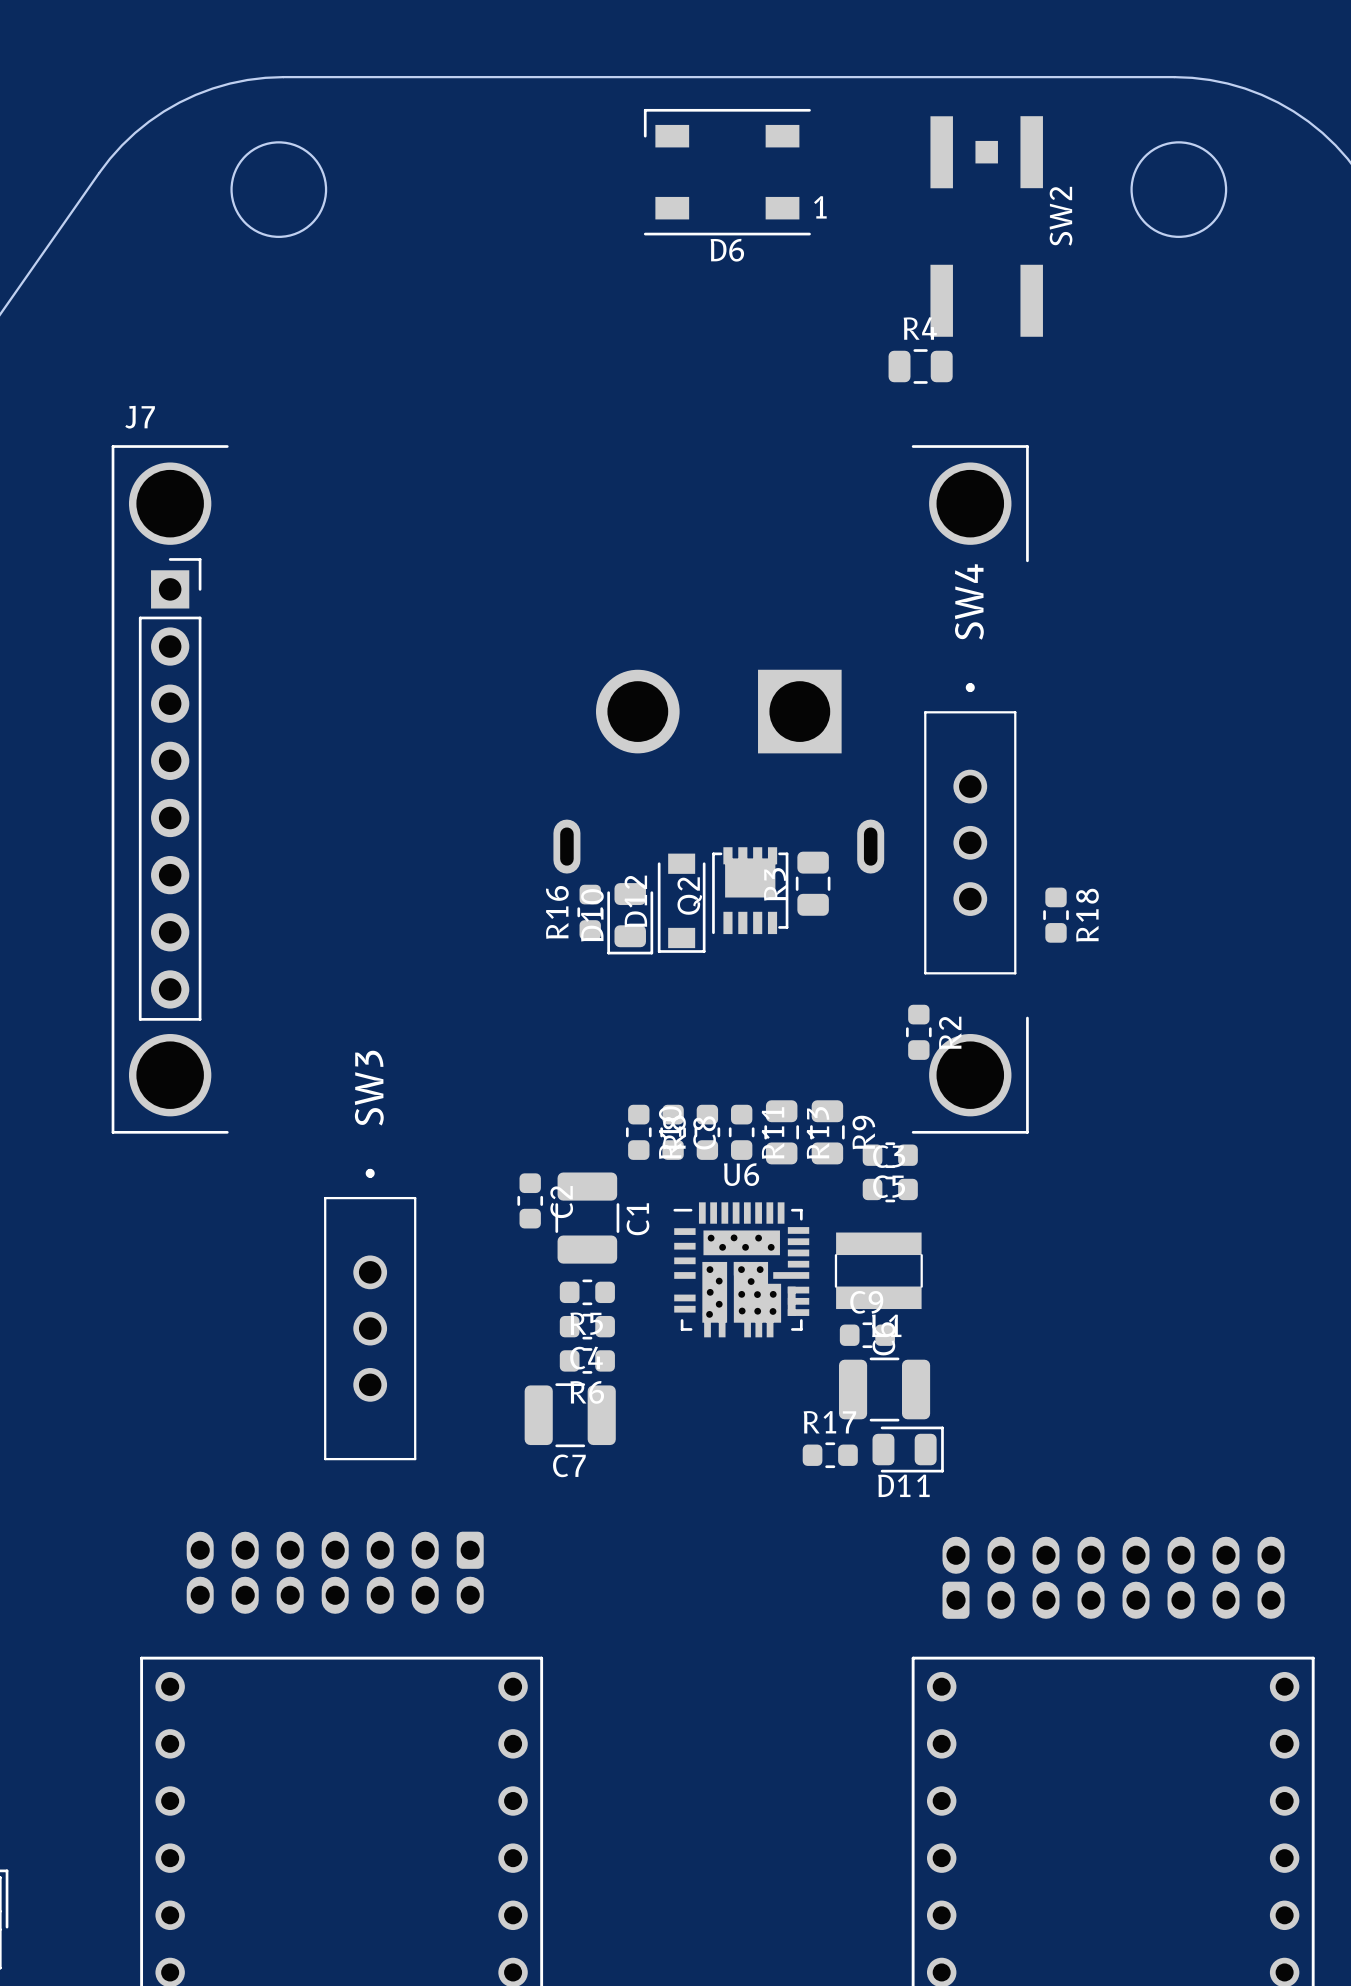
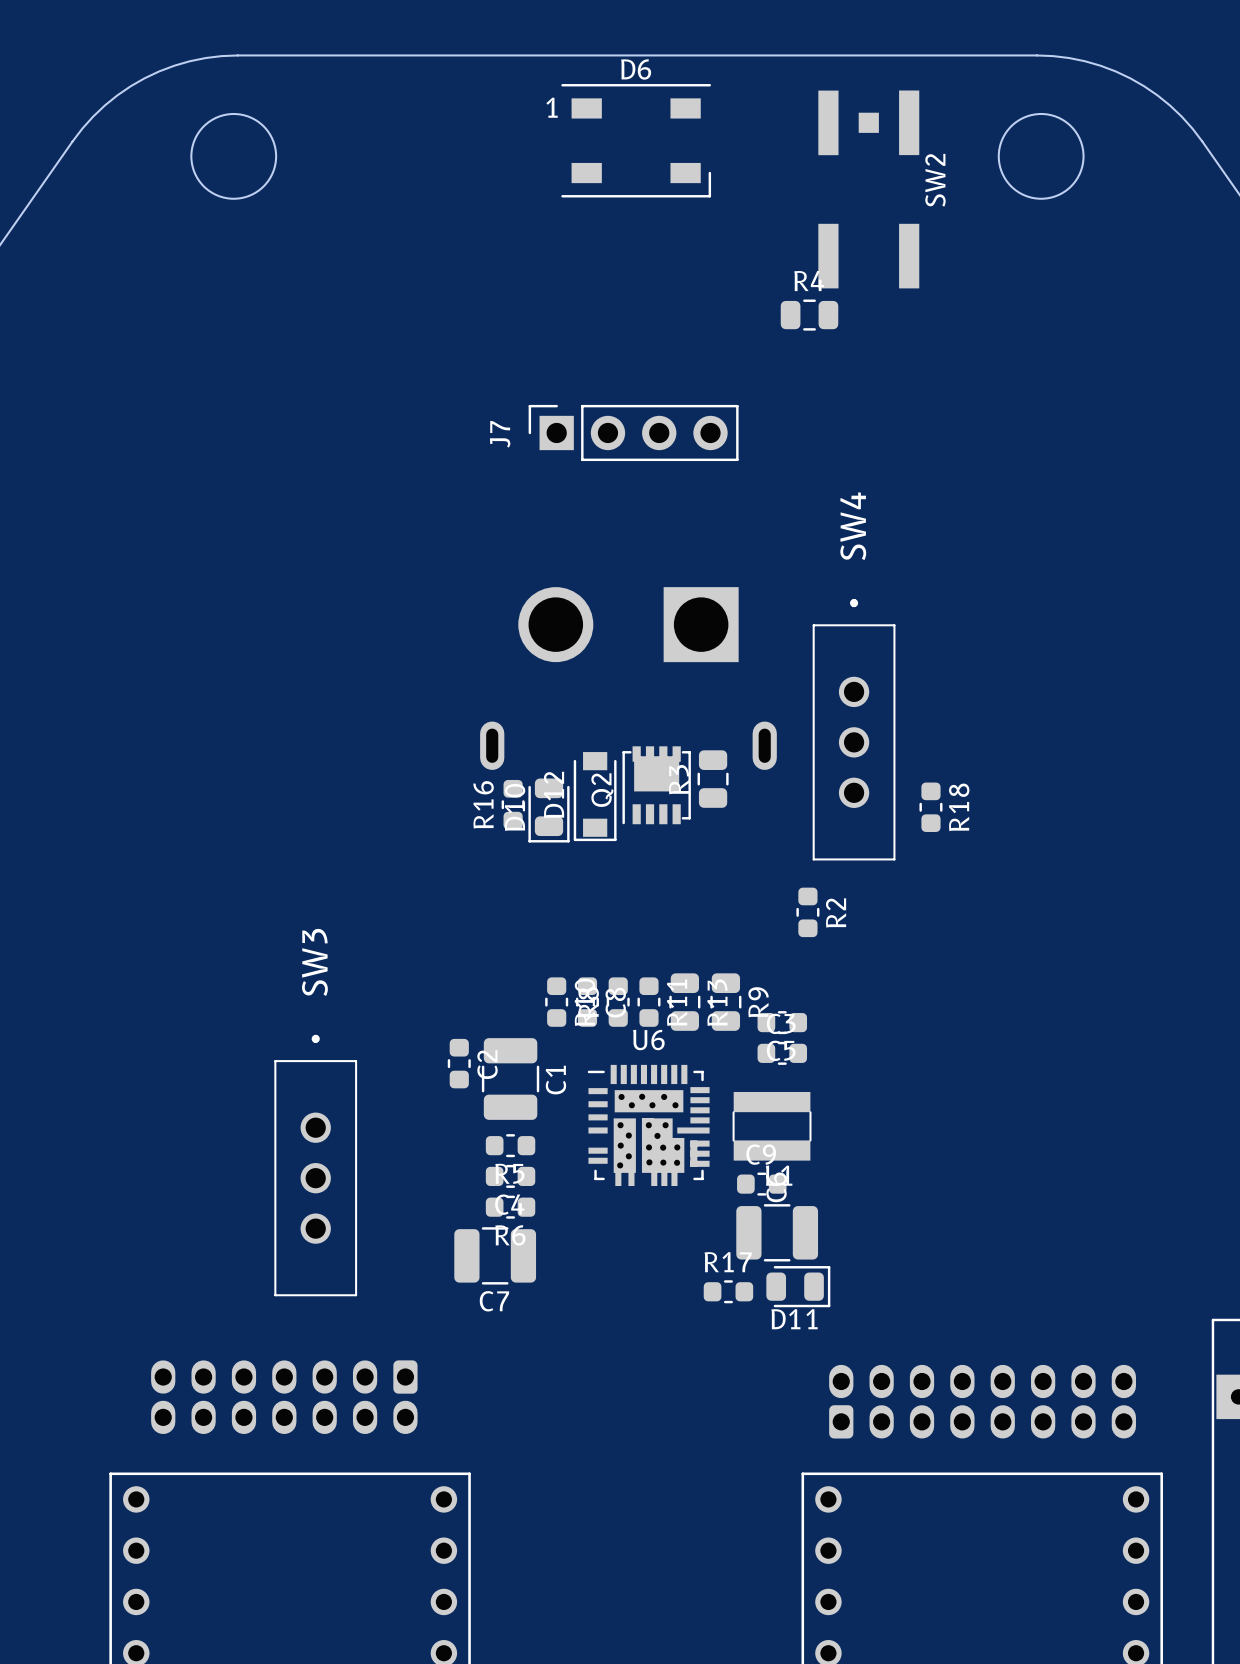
D6 rotation: 0° (727, 172) -> 180° (636, 140)
J7 name position: J7 (140, 417) -> J7 (500, 434)
J7 footprint: [111, 445, 1029, 1134] -> [528, 404, 739, 462]

